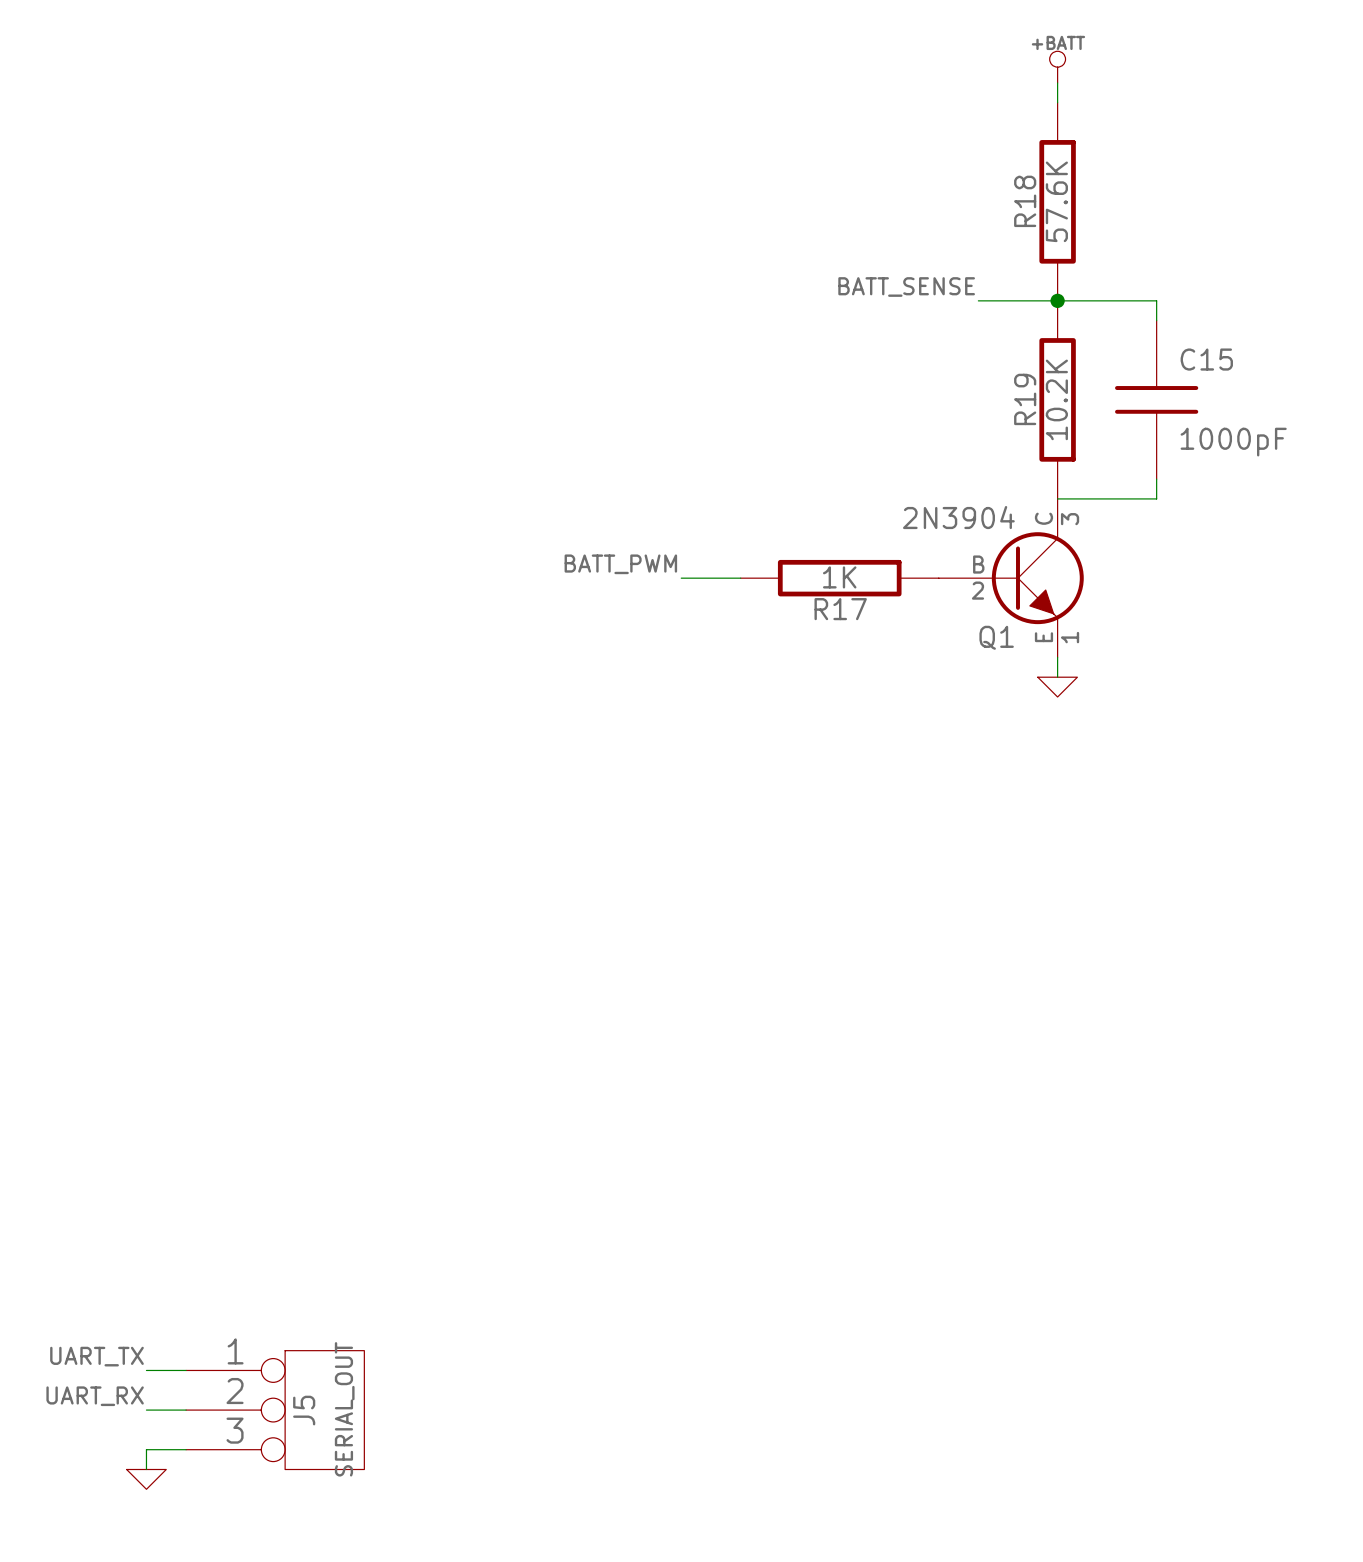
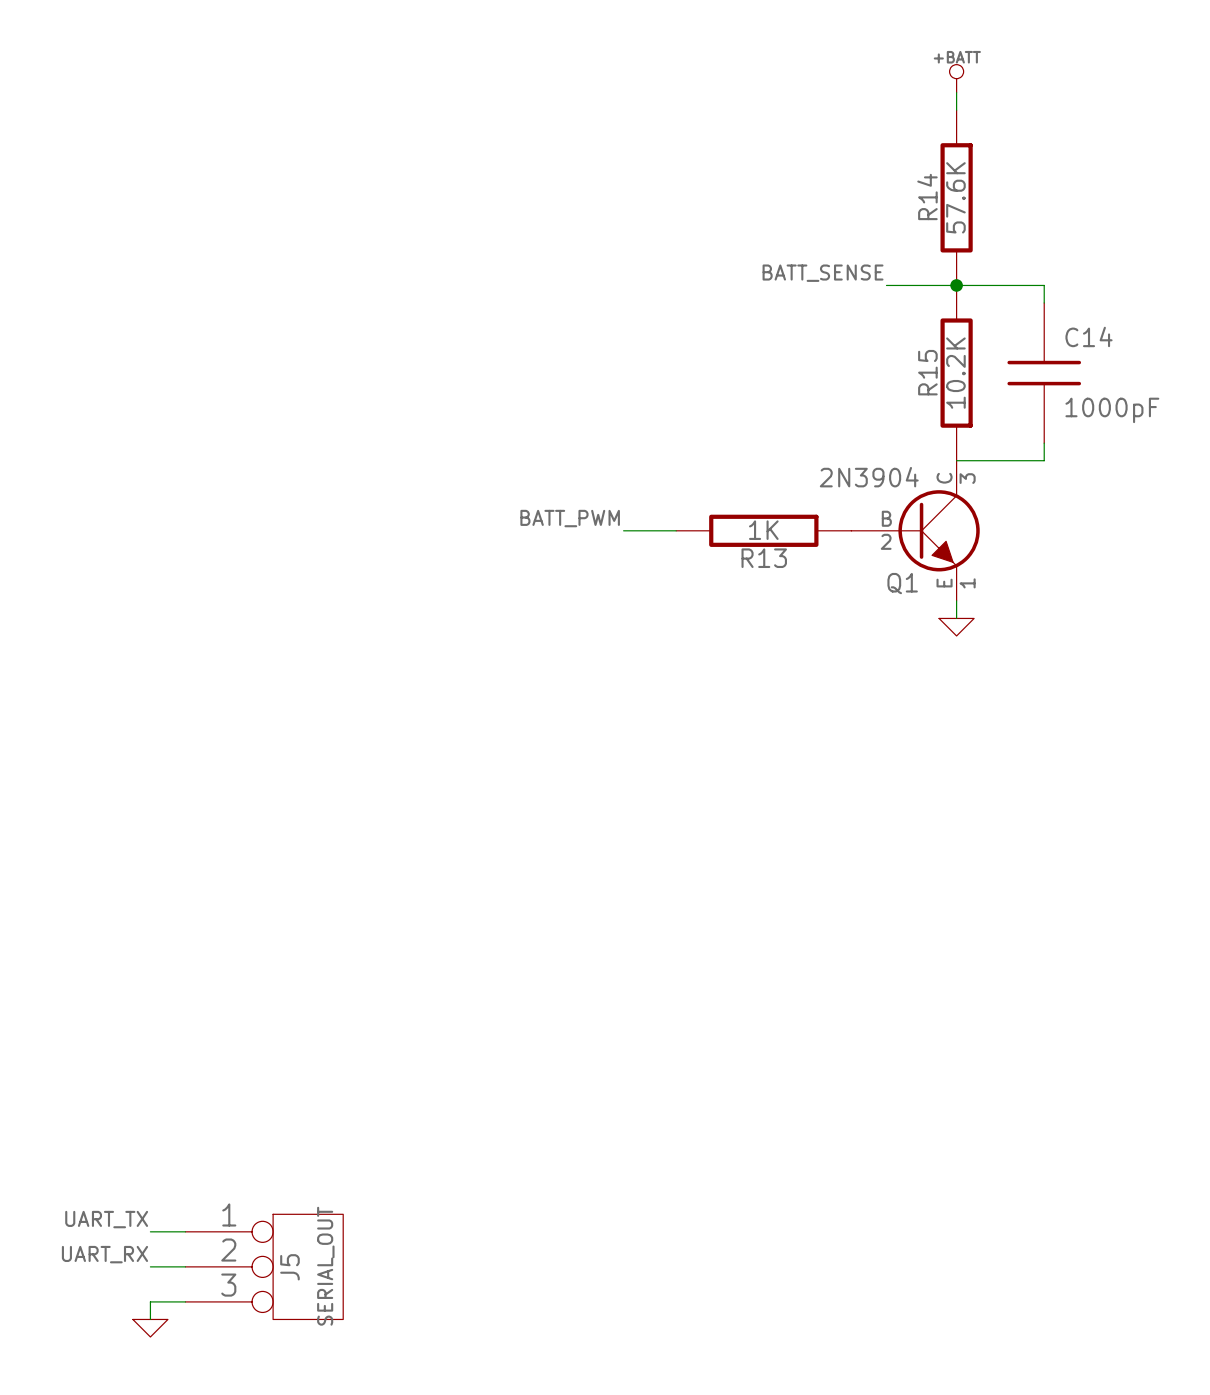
R18 name: R18 (1025, 201) -> R14 (927, 196)
C15 name: C15 (1206, 359) -> C14 (1089, 336)
R19 name: R19 (1025, 399) -> R15 (927, 372)
R17 name: R17 (840, 609) -> R13 (764, 558)

